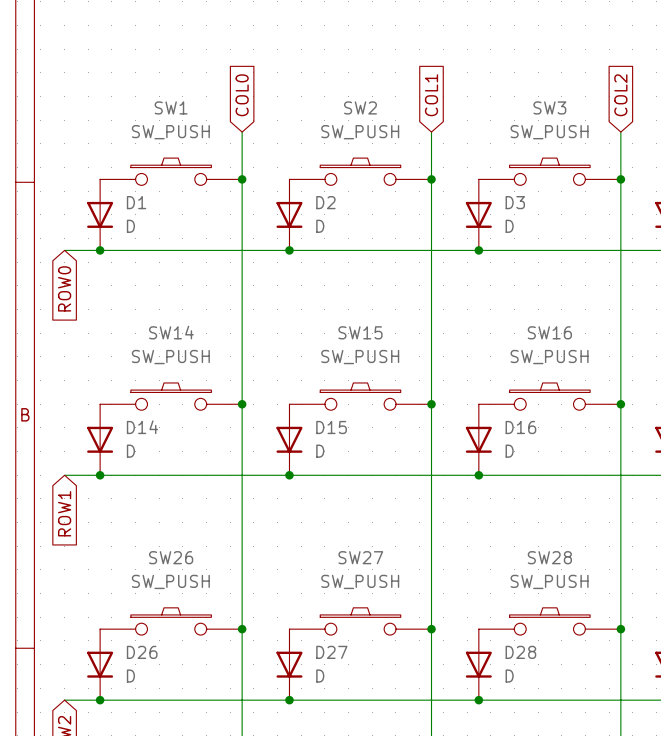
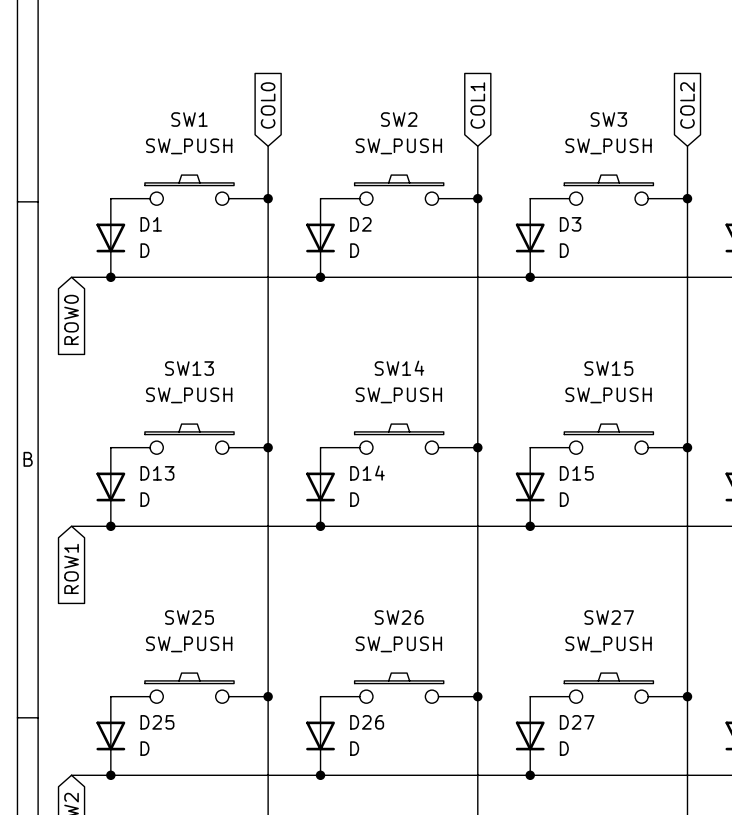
SW14 name: SW14 (171, 332) -> SW13 (189, 368)
SW15 name: SW15 (360, 332) -> SW14 (399, 368)
SW16 name: SW16 (549, 332) -> SW15 (608, 368)
D14 name: D14 (142, 427) -> D13 (157, 473)
D15 name: D15 (331, 427) -> D14 (367, 473)
D16 name: D16 (520, 427) -> D15 (576, 473)
SW26 name: SW26 (171, 557) -> SW25 (189, 617)
SW27 name: SW27 (360, 557) -> SW26 (399, 617)
SW28 name: SW28 (549, 557) -> SW27 (609, 617)
D26 name: D26 (142, 652) -> D25 (157, 722)
D27 name: D27 (331, 652) -> D26 (367, 722)
D28 name: D28 (520, 652) -> D27 (577, 722)

